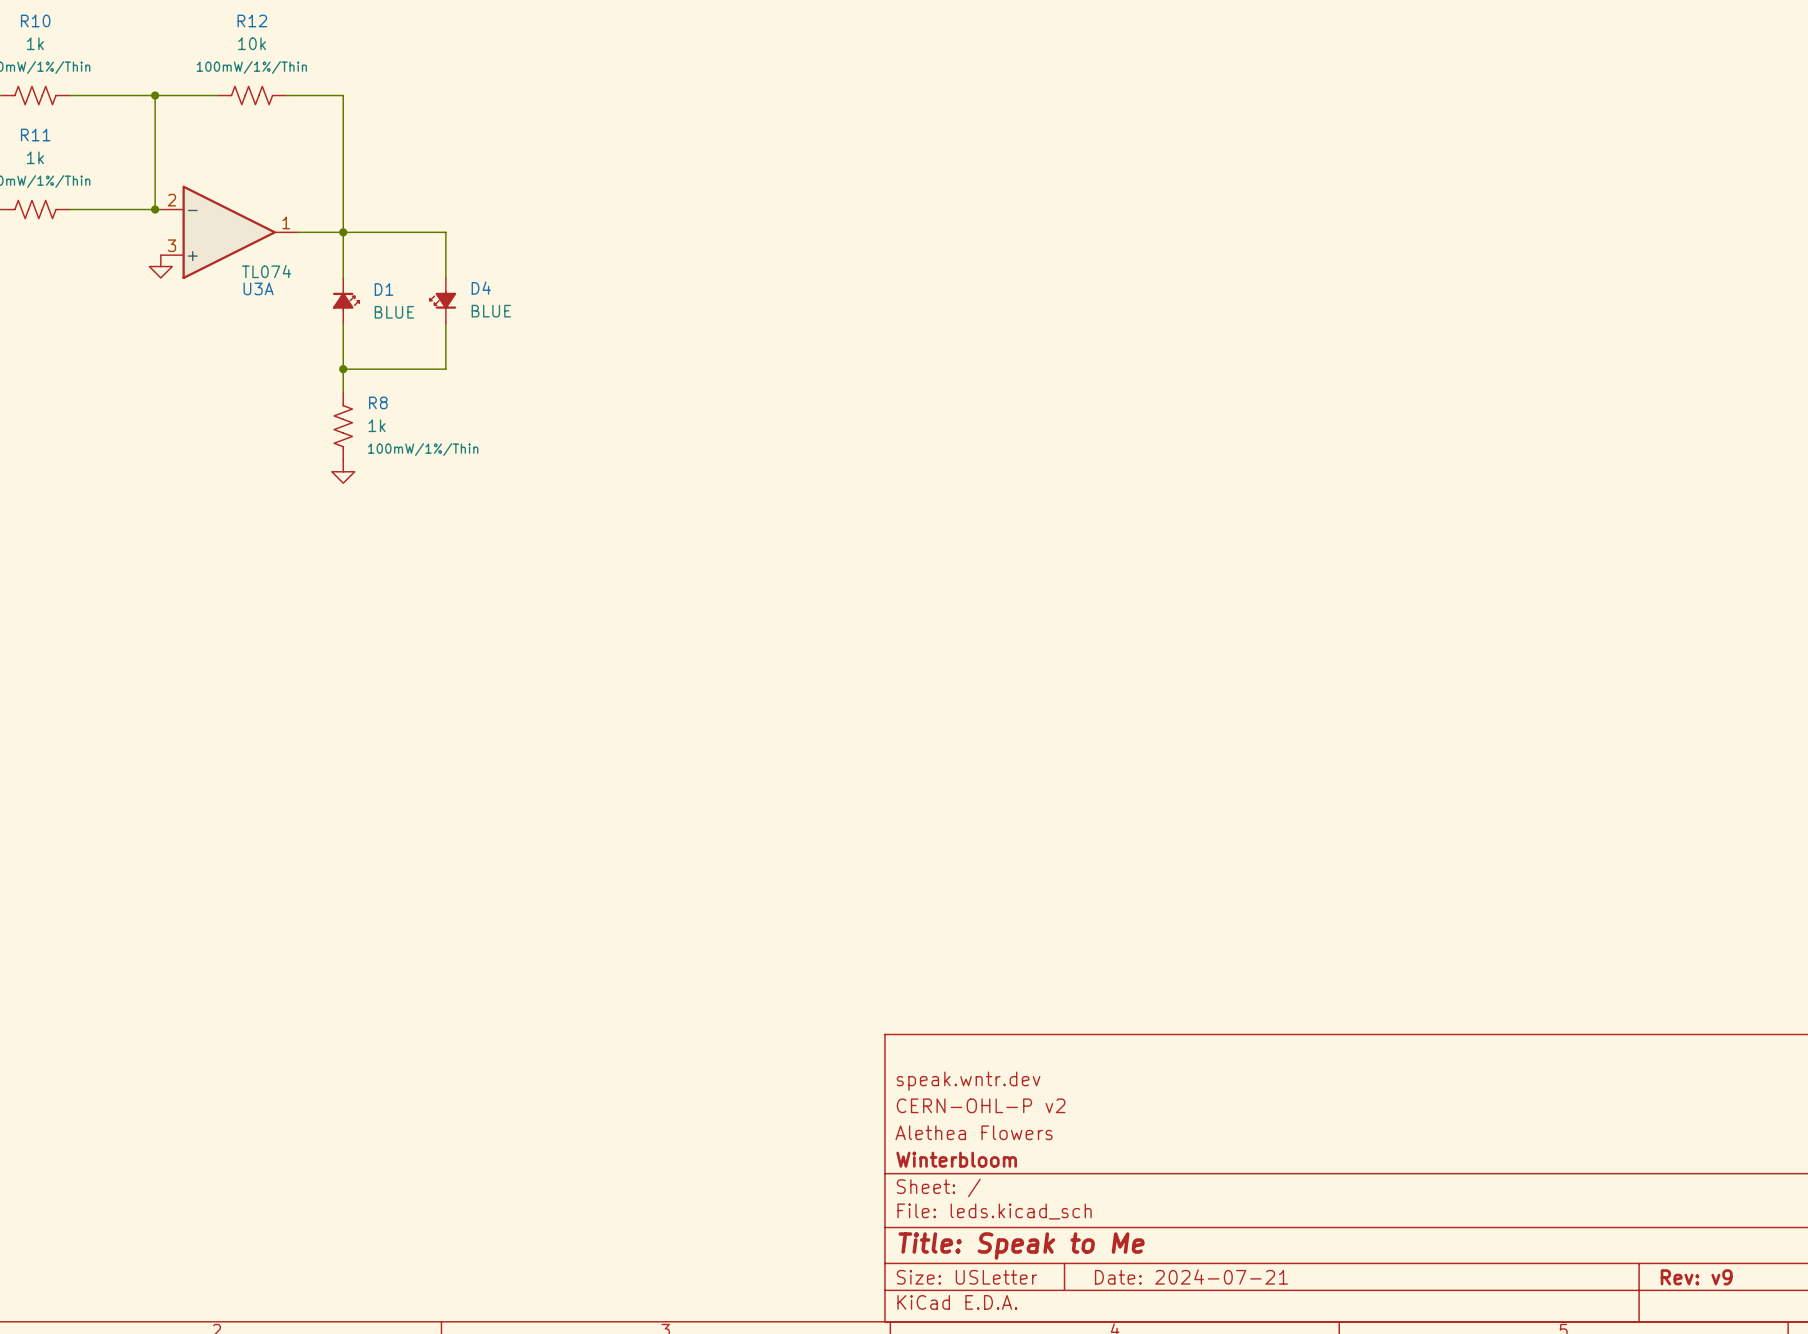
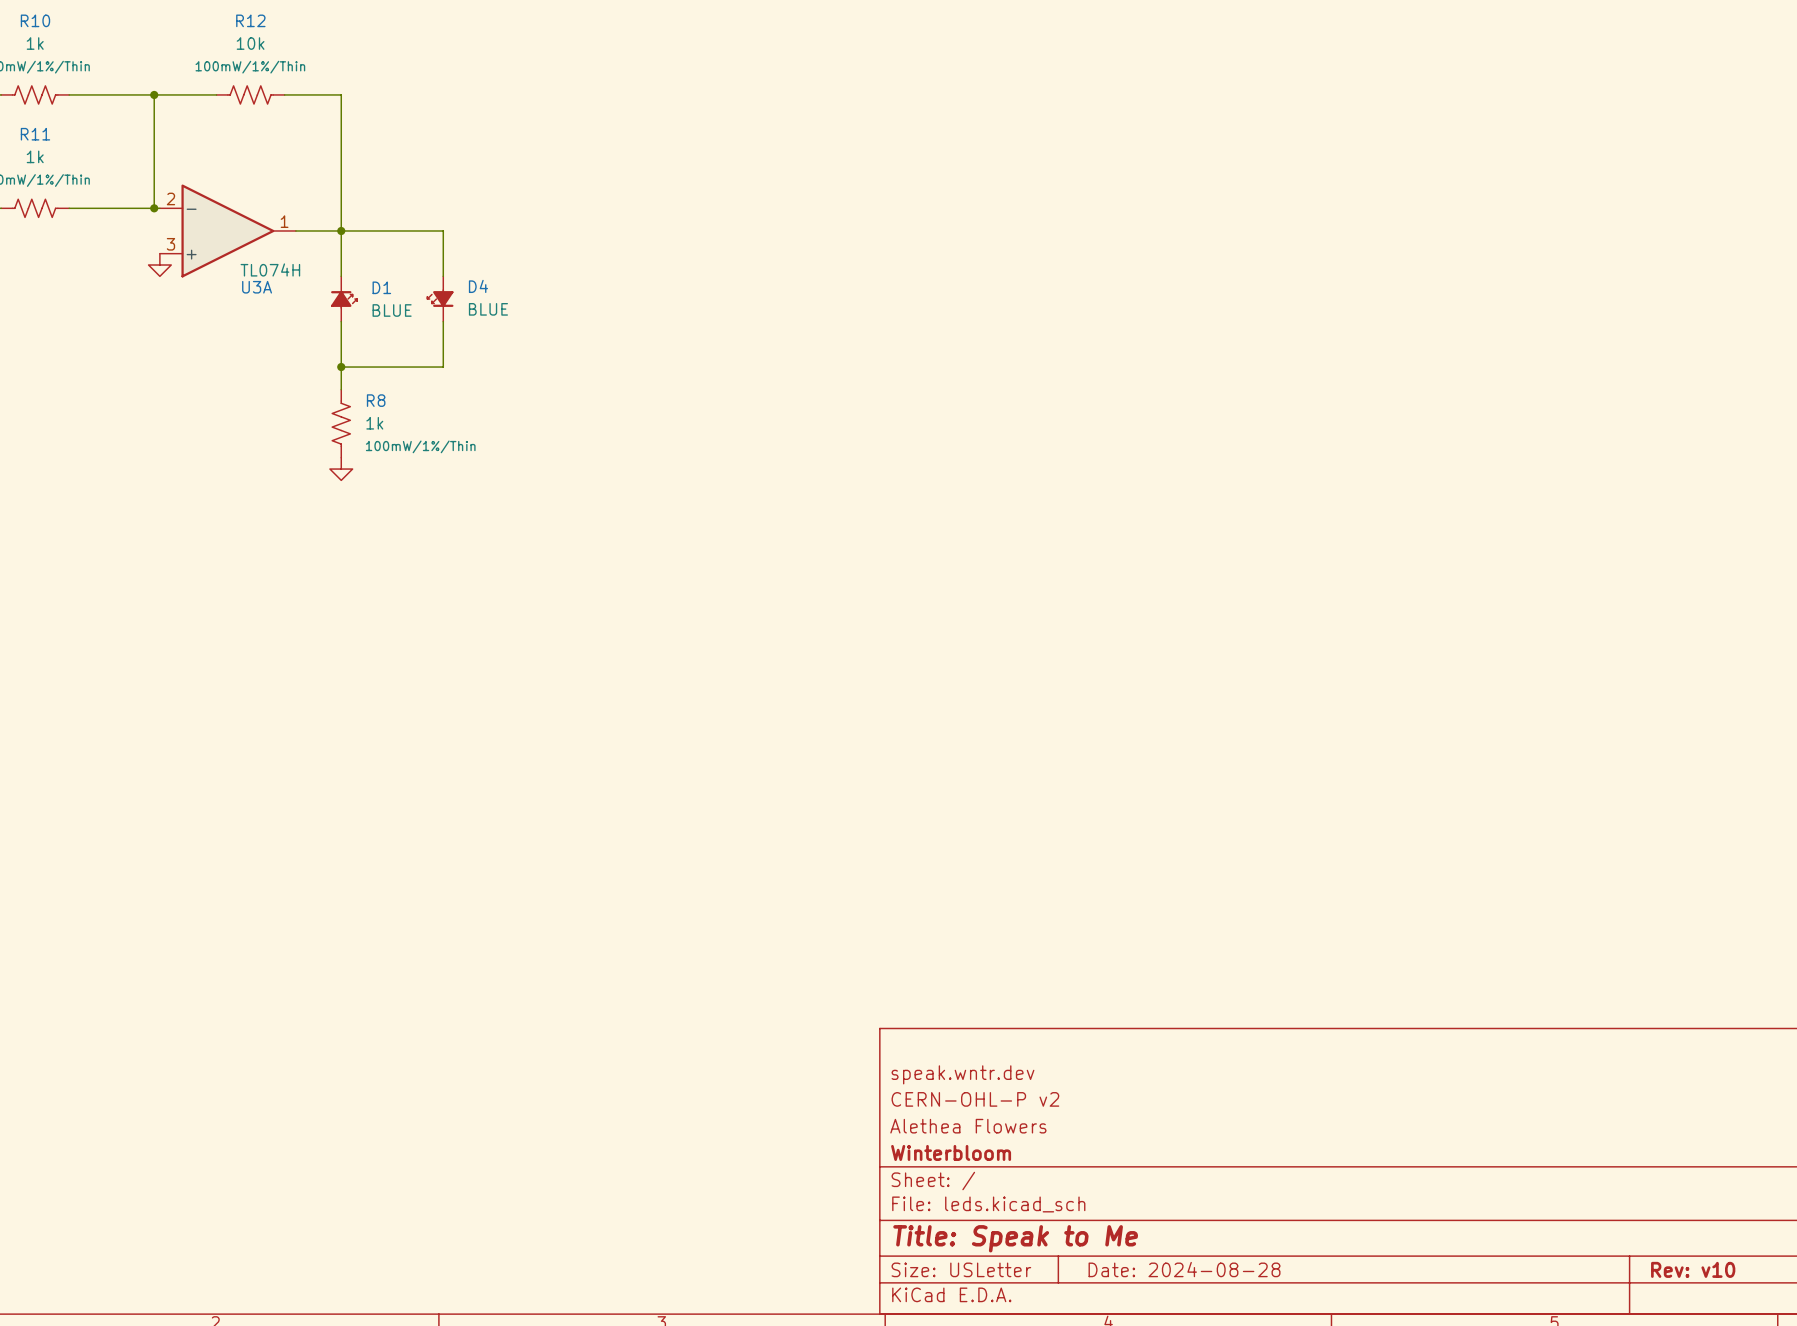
U3A value: TL074 (266, 271) -> TL074H (270, 269)
title block: Date: 2024-07-21 (1191, 1276) -> Date: 2024-08-28 (1184, 1269)
title block: Rev: v9 (1696, 1277) -> Rev: v10 (1693, 1269)

